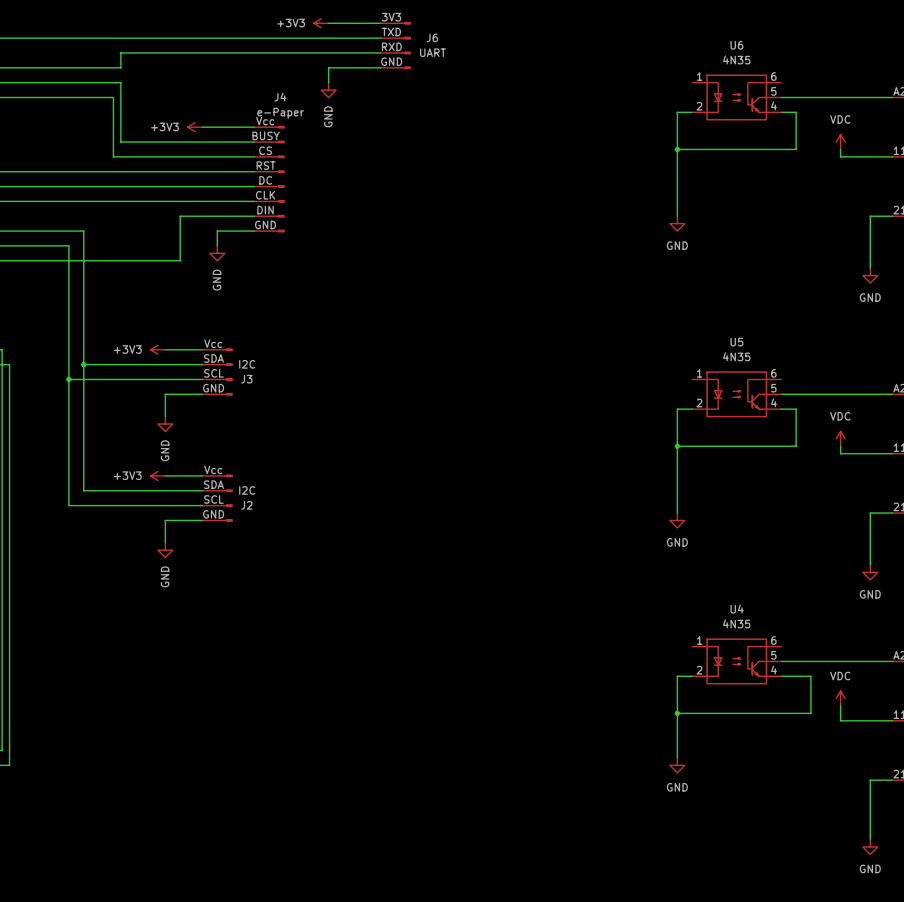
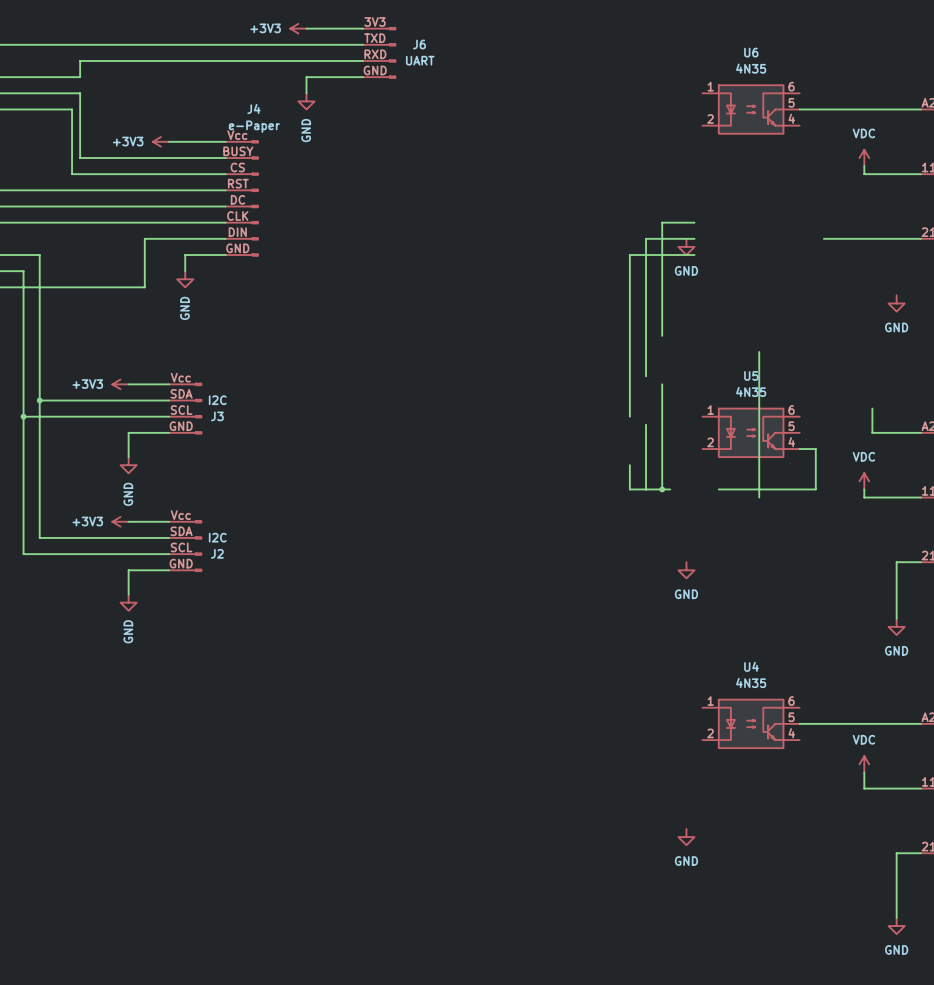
wire: (692, 112) (677, 112) (677, 216) -> none
wire: (781, 112) (796, 112) (796, 149) (677, 149) -> none
junction: (677, 149) -> none
wire: none -> (694, 222) (662, 222) (662, 335)
wire: none -> (694, 238) (646, 238) (646, 376)
wire: (870, 216) (870, 268) -> (896, 238) (823, 238)
wire: none -> (694, 255) (629, 255) (629, 416)
wire: none -> (759, 352) (759, 497)
wire: none -> (662, 384) (662, 489)
wire: none -> (646, 424) (646, 489)
wire: (781, 394) (848, 394) -> (872, 408) (872, 432)
wire: (692, 409) (677, 409) (677, 513) -> none
wire: none -> (629, 465) (629, 489) (670, 489)
wire: (677, 446) (707, 446) -> none
junction position: (677, 446) -> (662, 489)
wire: (692, 676) (677, 676) (677, 757) -> none
wire: (781, 676) (810, 676) (810, 713) (677, 713) -> none
junction: (677, 713) -> none

